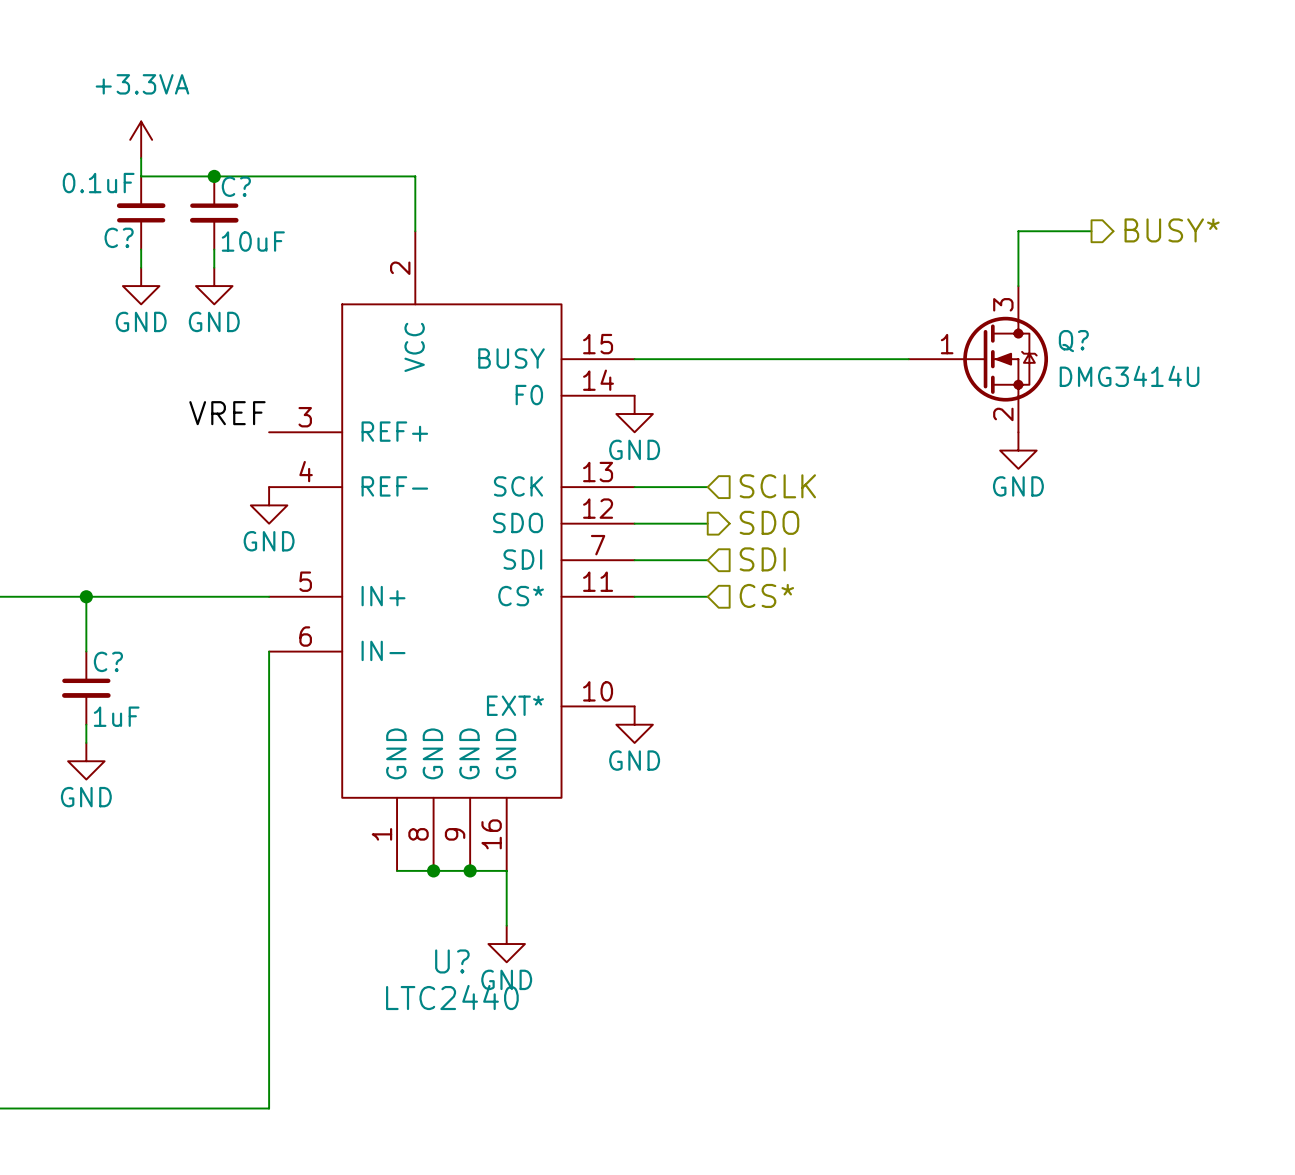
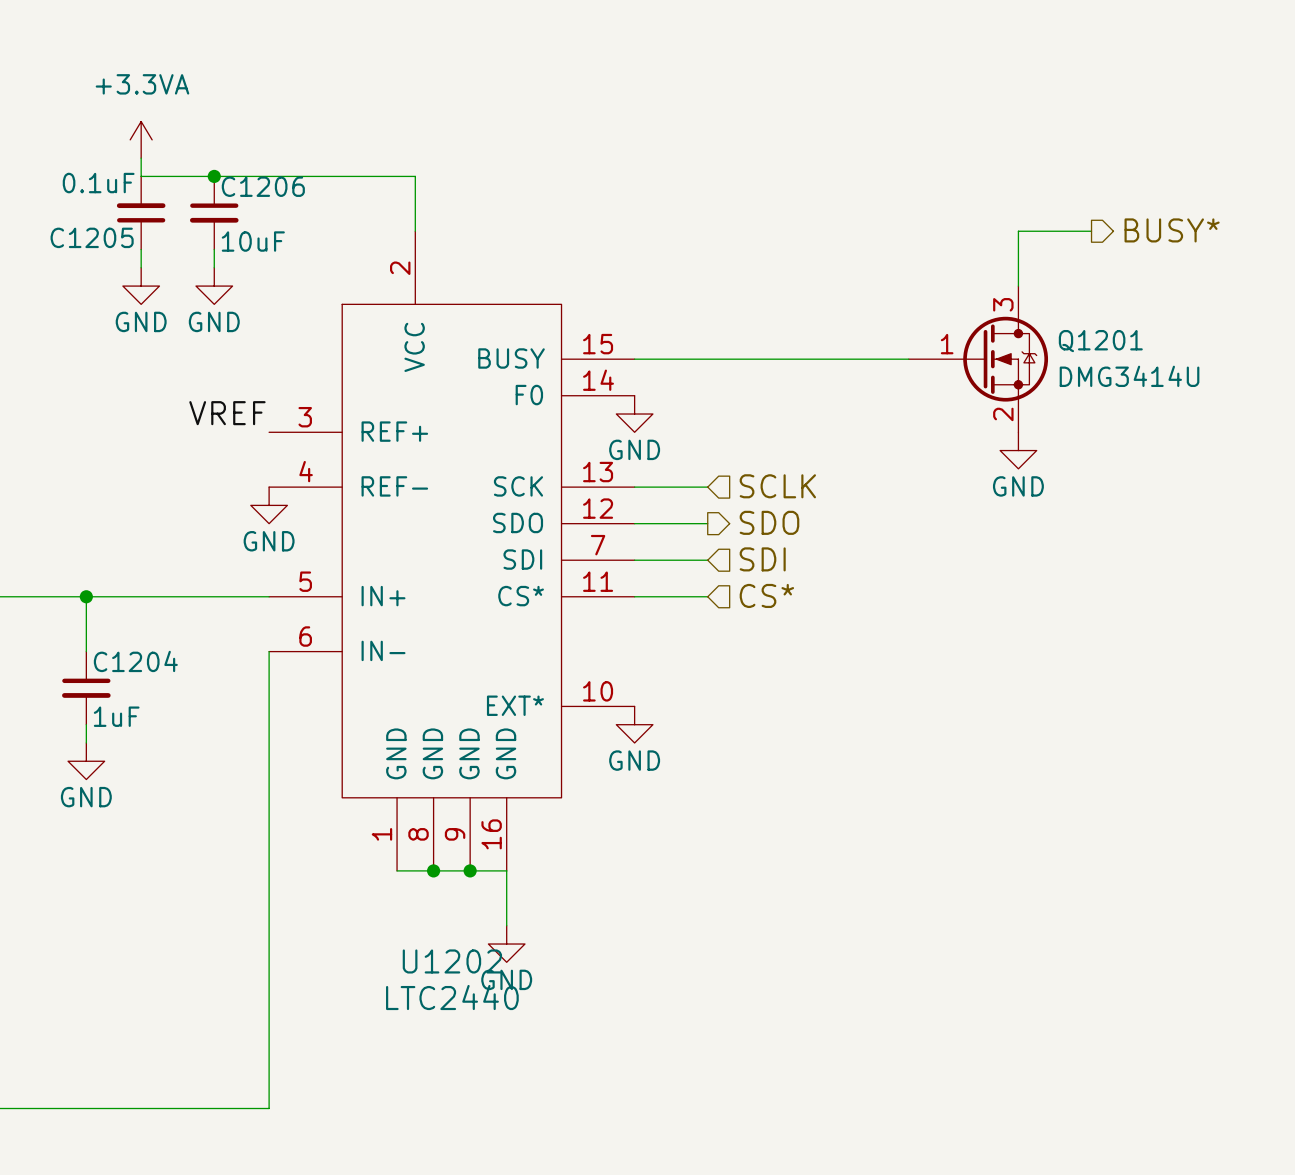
C? name: C? (236, 186) -> C1206 (263, 186)
C? name: C? (119, 237) -> C1205 (92, 237)
Q? name: Q? (1073, 341) -> Q1201 (1100, 341)
C? name: C? (108, 661) -> C1204 (135, 661)
U? name: U? (452, 961) -> U1202 (452, 961)

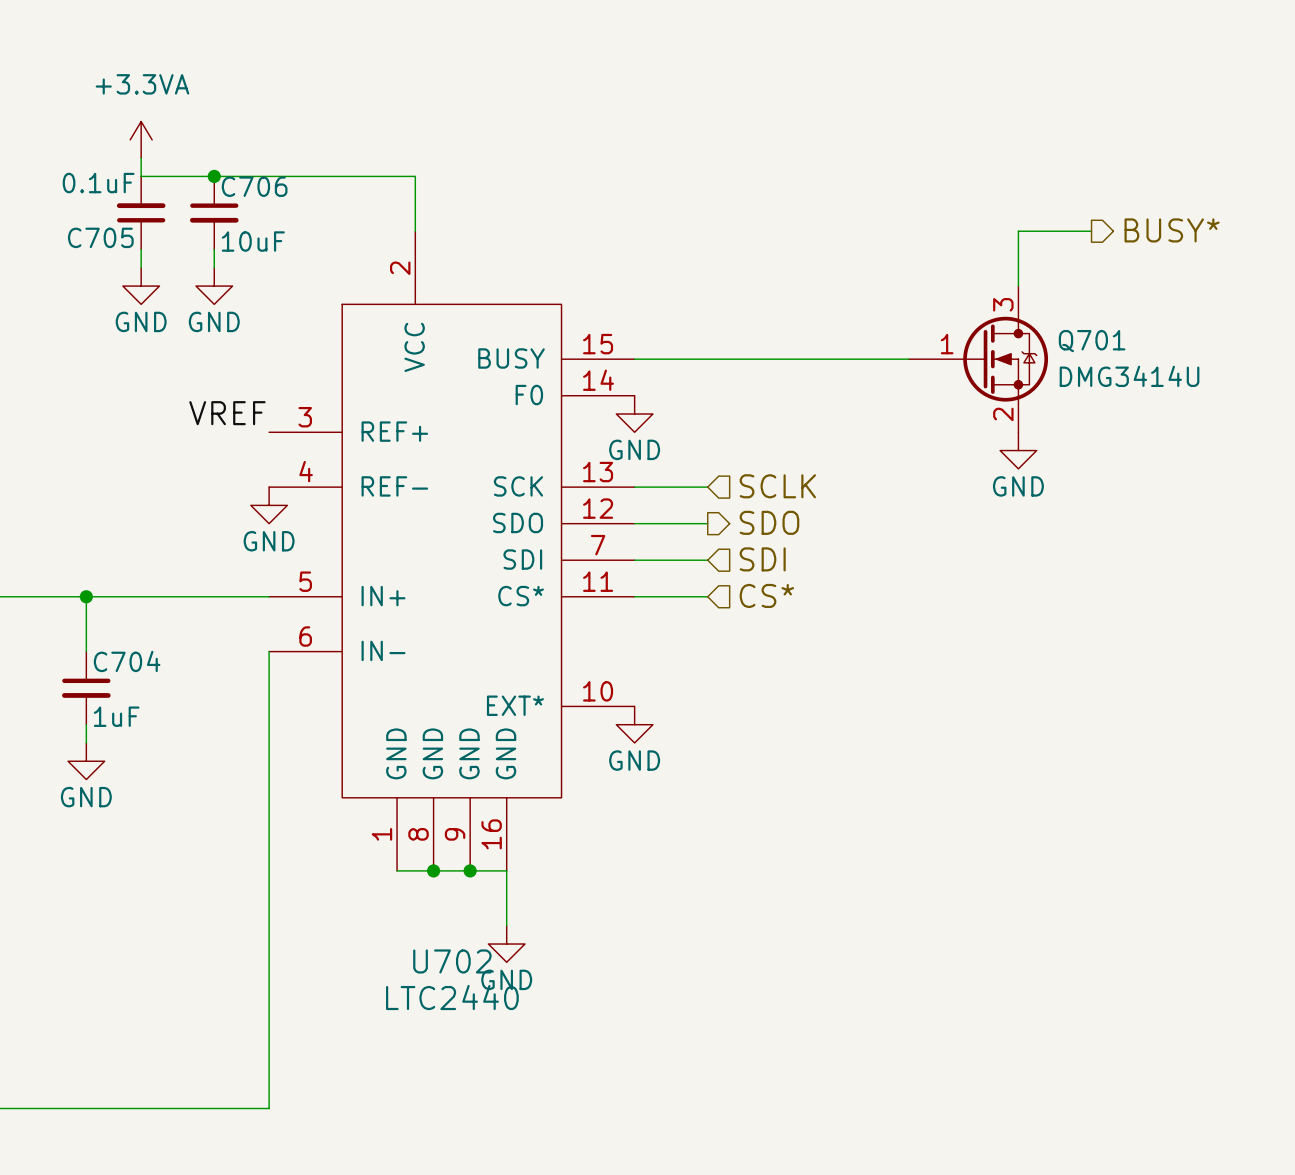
C1206 name: C1206 (263, 186) -> C706 (254, 186)
C1205 name: C1205 (92, 237) -> C705 (100, 237)
Q1201 name: Q1201 (1100, 341) -> Q701 (1092, 341)
C1204 name: C1204 (135, 661) -> C704 (127, 661)
U1202 name: U1202 (452, 961) -> U702 (452, 961)

